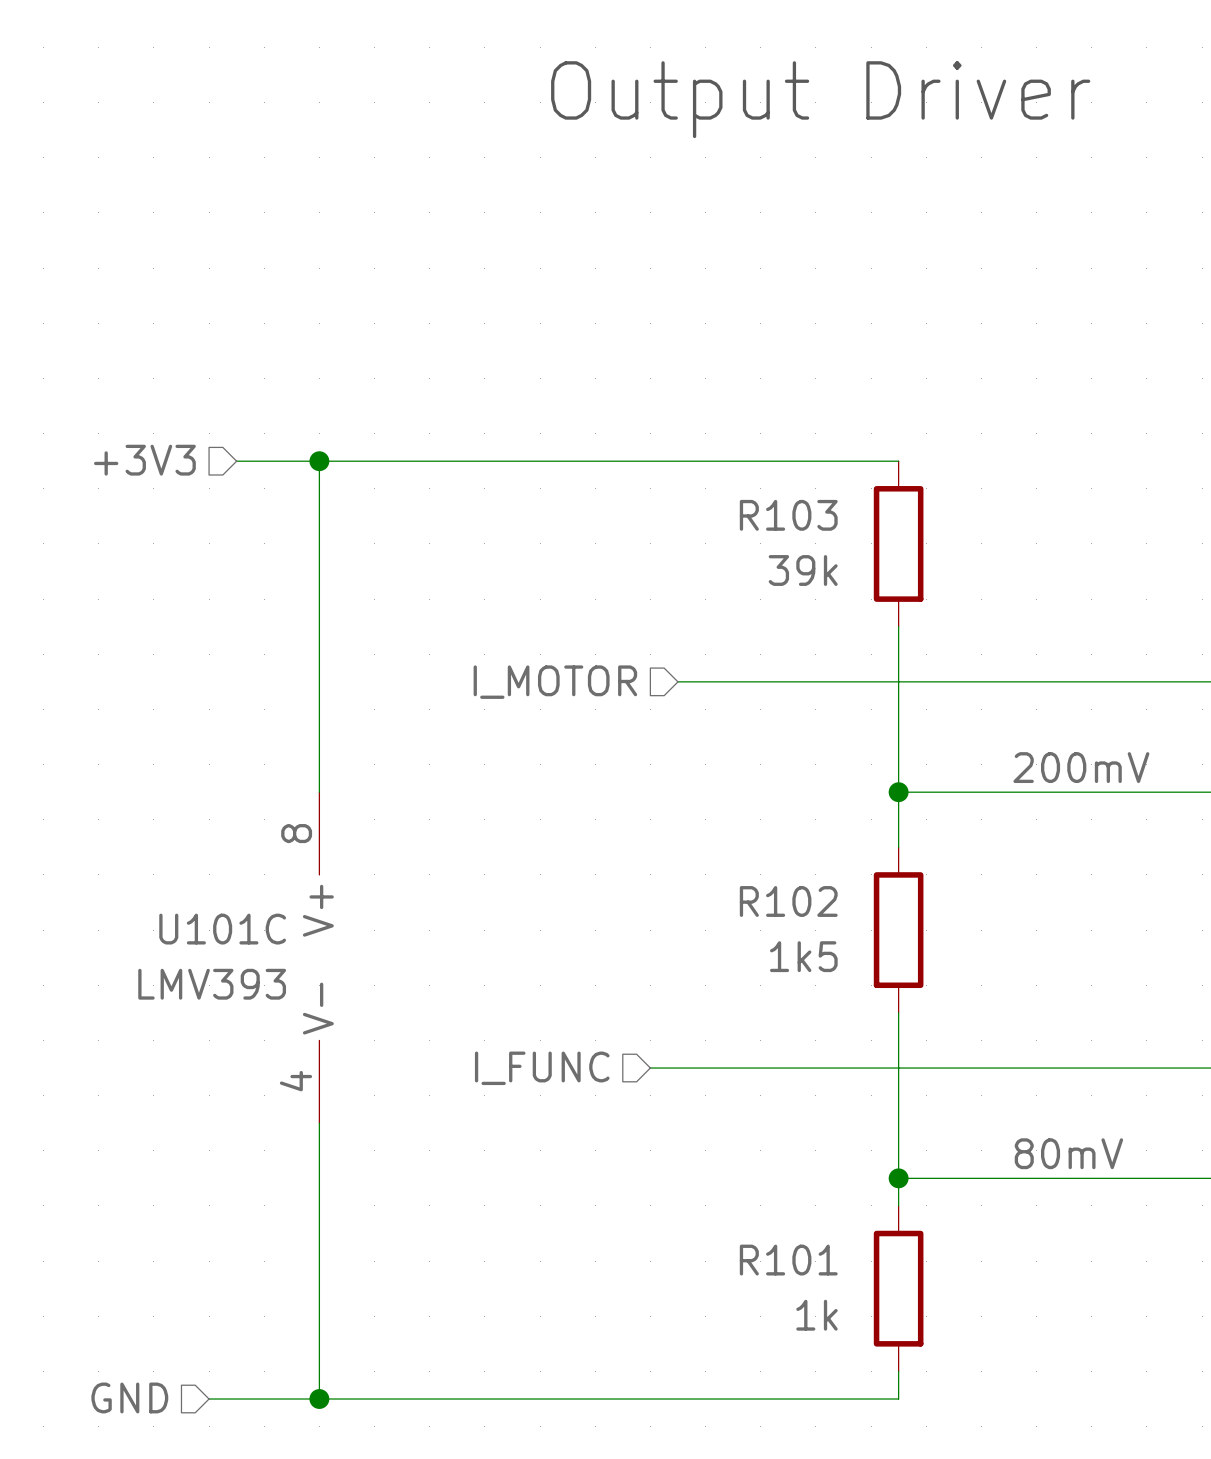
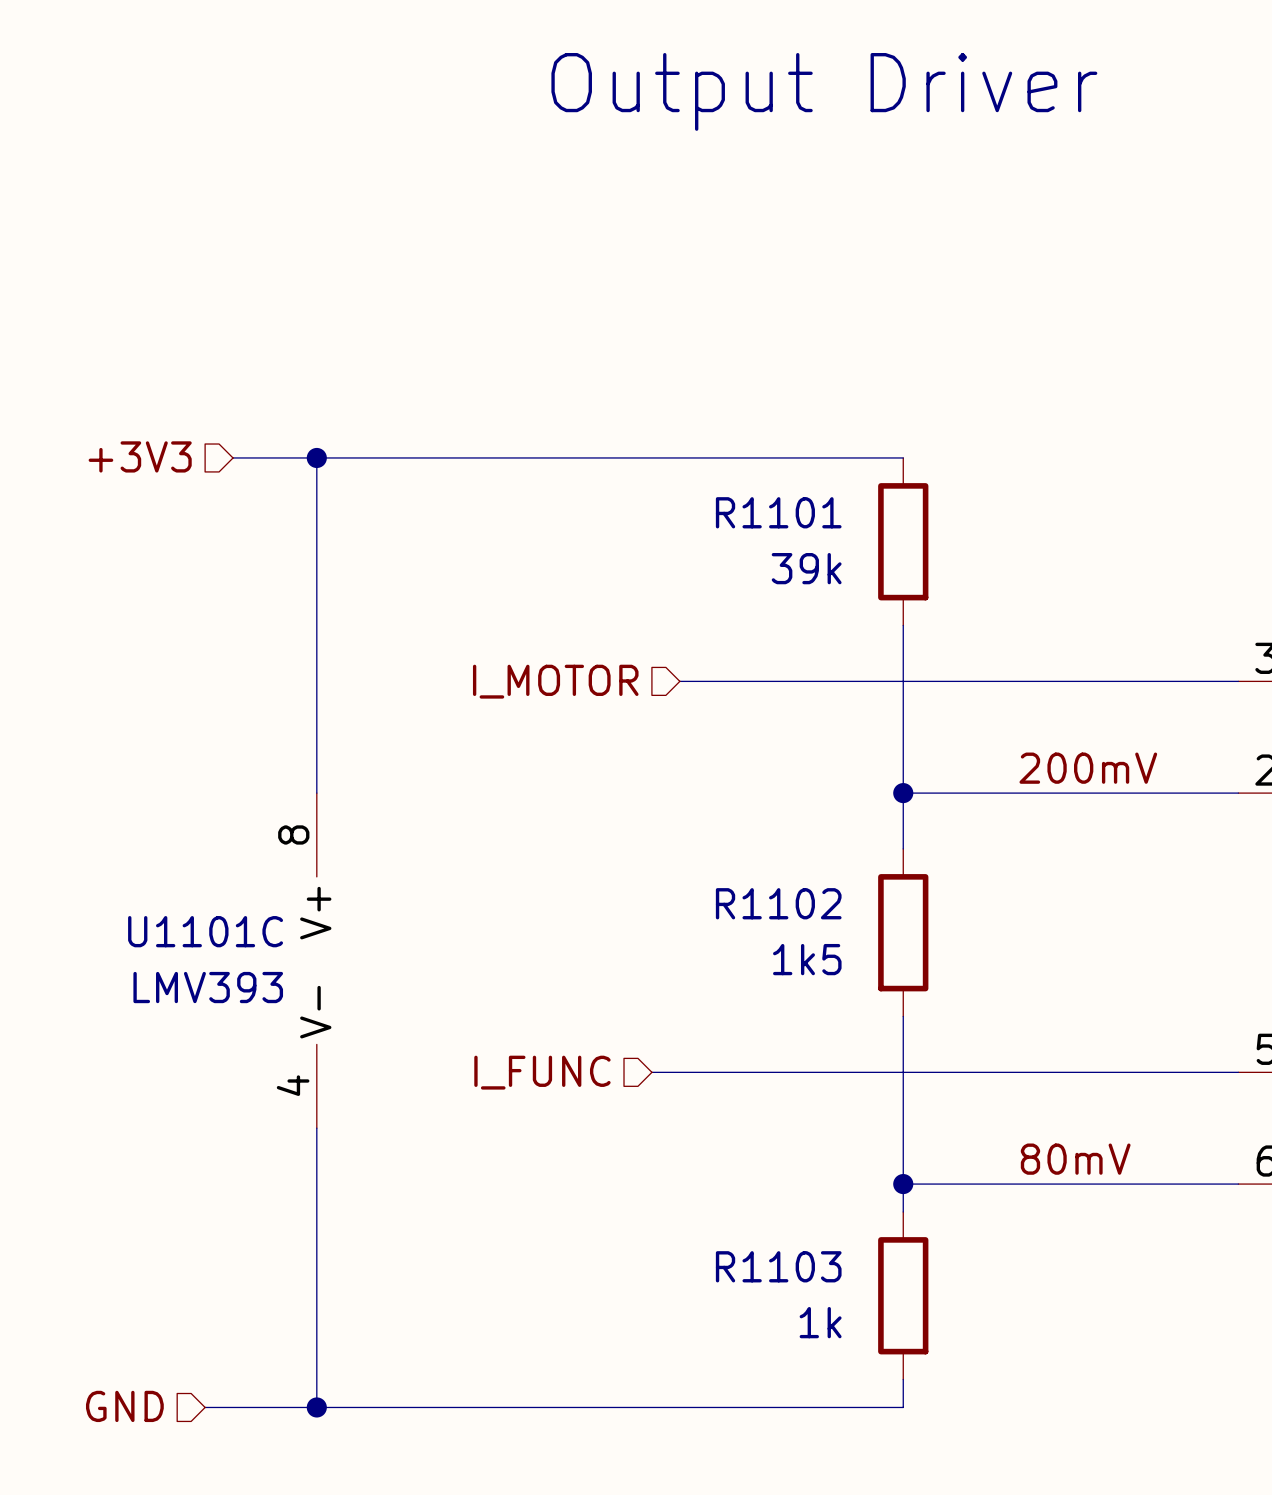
R103 name: R103 (788, 515) -> R1101 (778, 512)
R102 name: R102 (788, 901) -> R1102 (778, 903)
U101C name: U101C (222, 929) -> U1101C (205, 931)
R101 name: R101 (788, 1260) -> R1103 (778, 1266)

